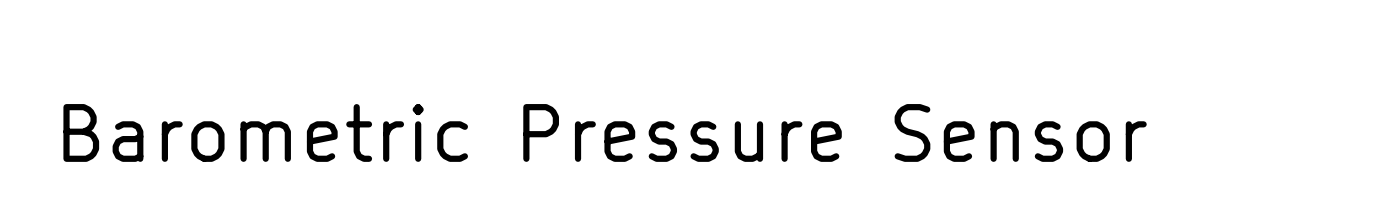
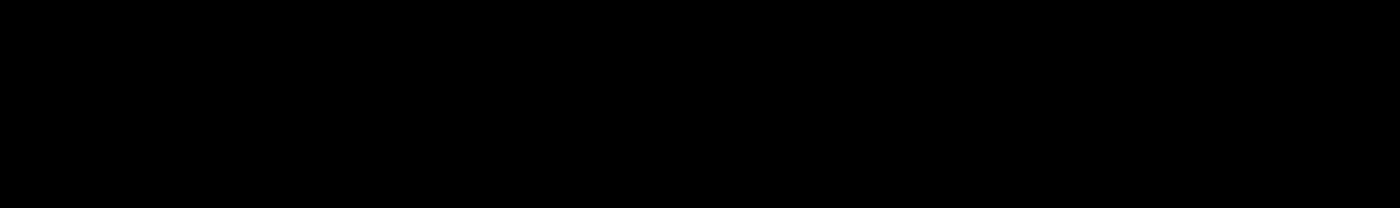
text: Barometric Pressure Sensor (605, 132) -> none

